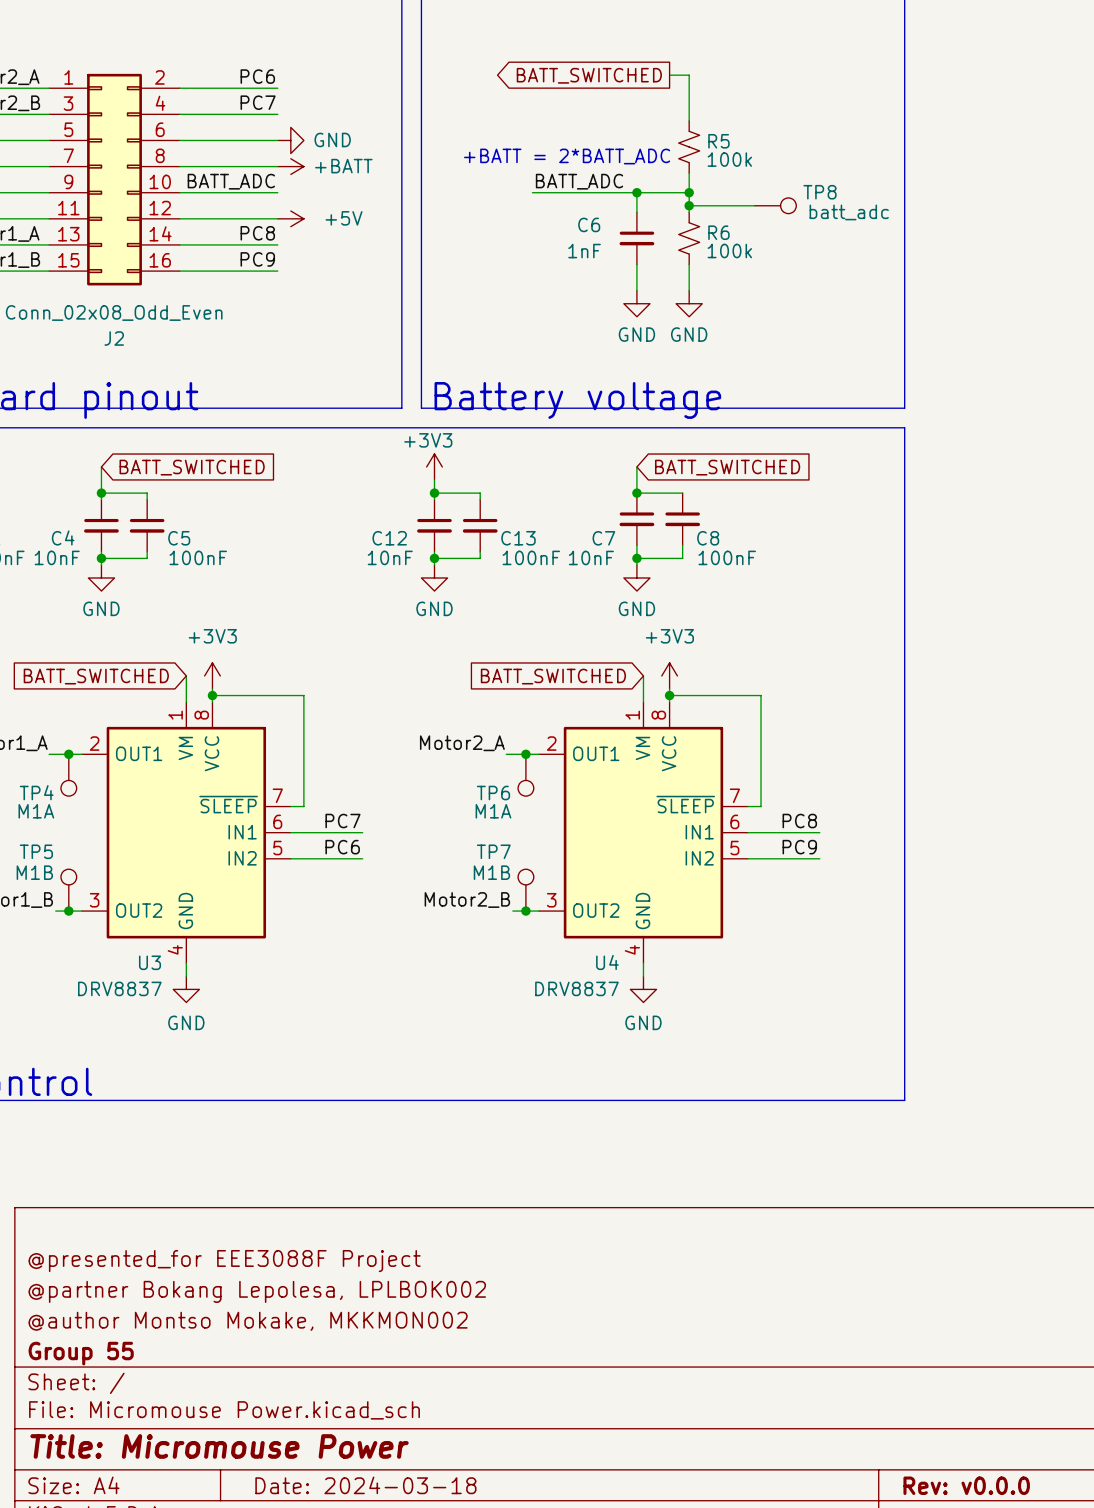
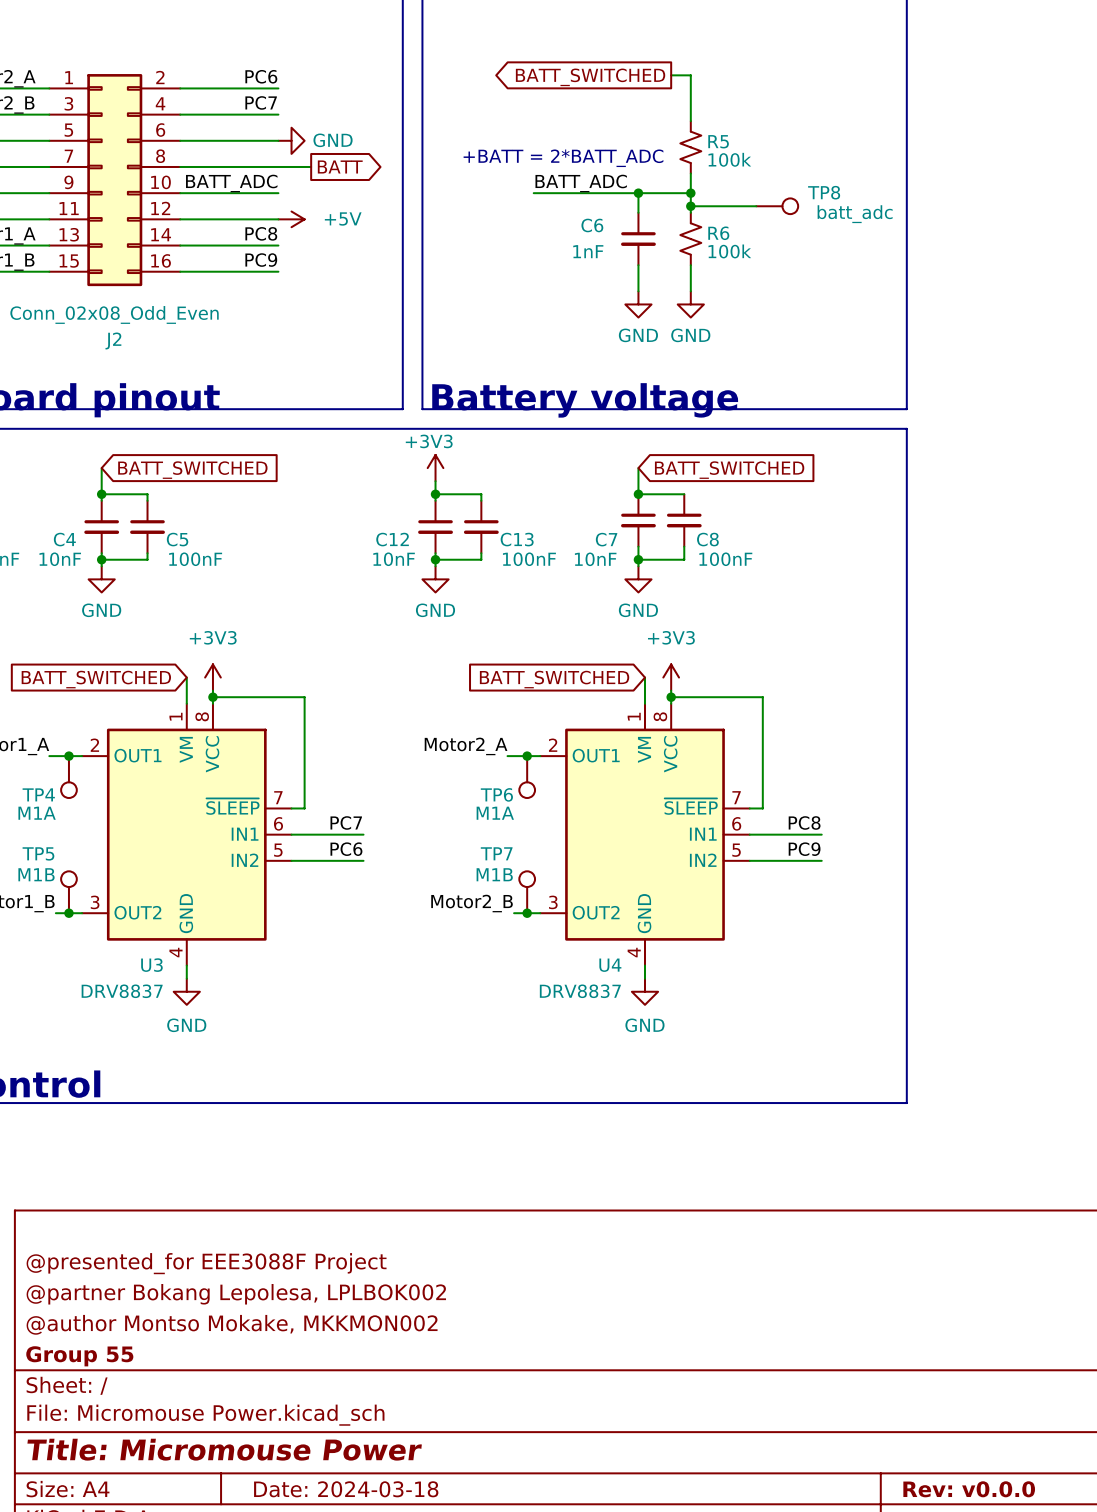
power symbol: +BATT (290, 166) -> none
global label: none -> BATT (340, 166)

